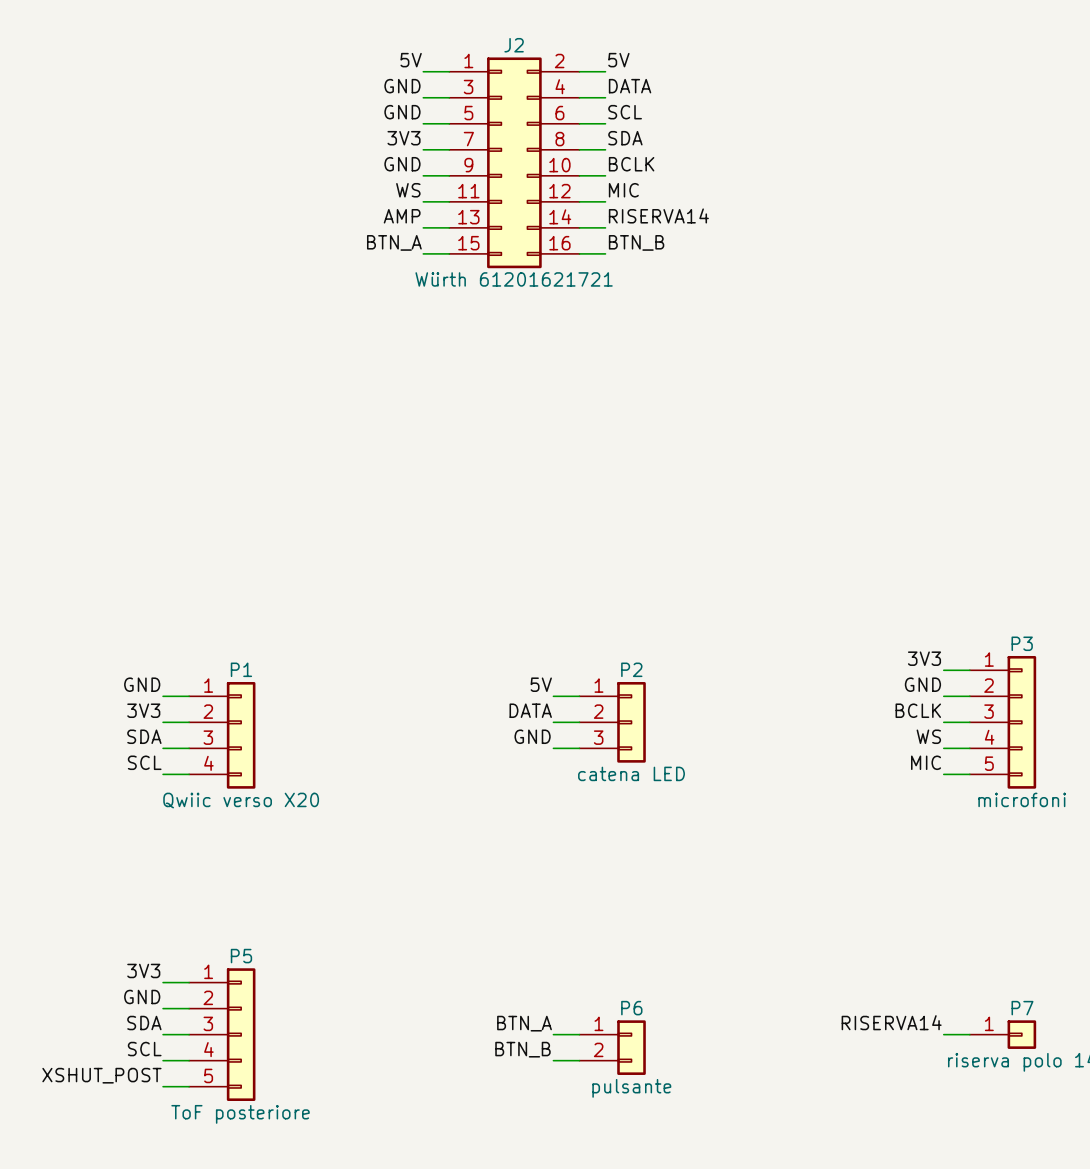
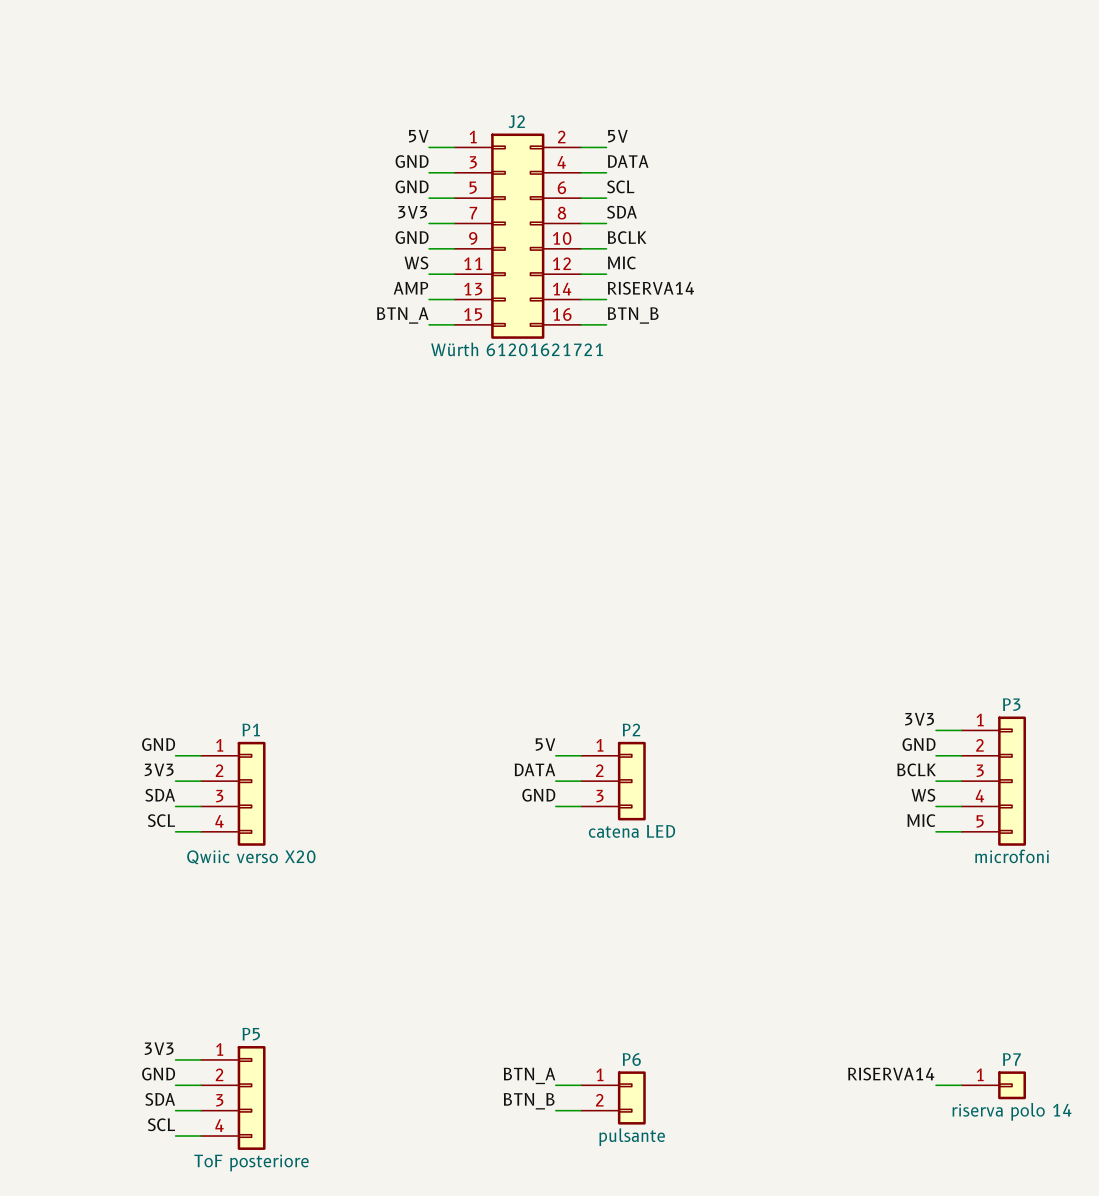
P5 symbol: [189, 968, 256, 1101] -> [200, 1046, 266, 1150]
label: 3V3 (143, 970) -> none
wire: (163, 982) (189, 982) -> none
label: GND (142, 996) -> 3V3 (159, 1048)
label: SDA (144, 1023) -> GND (158, 1074)
label: SCL (144, 1049) -> SDA (160, 1099)
label: XSHUT_POST (101, 1075) -> SCL (161, 1124)

